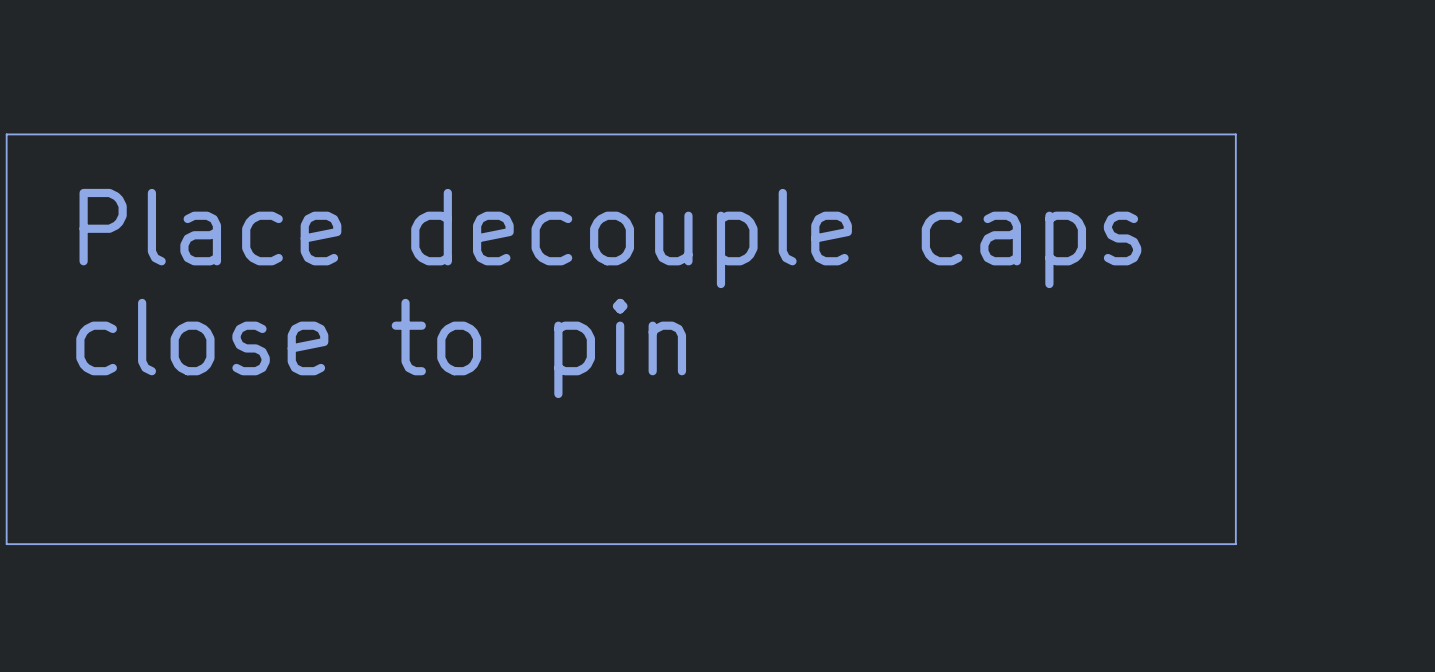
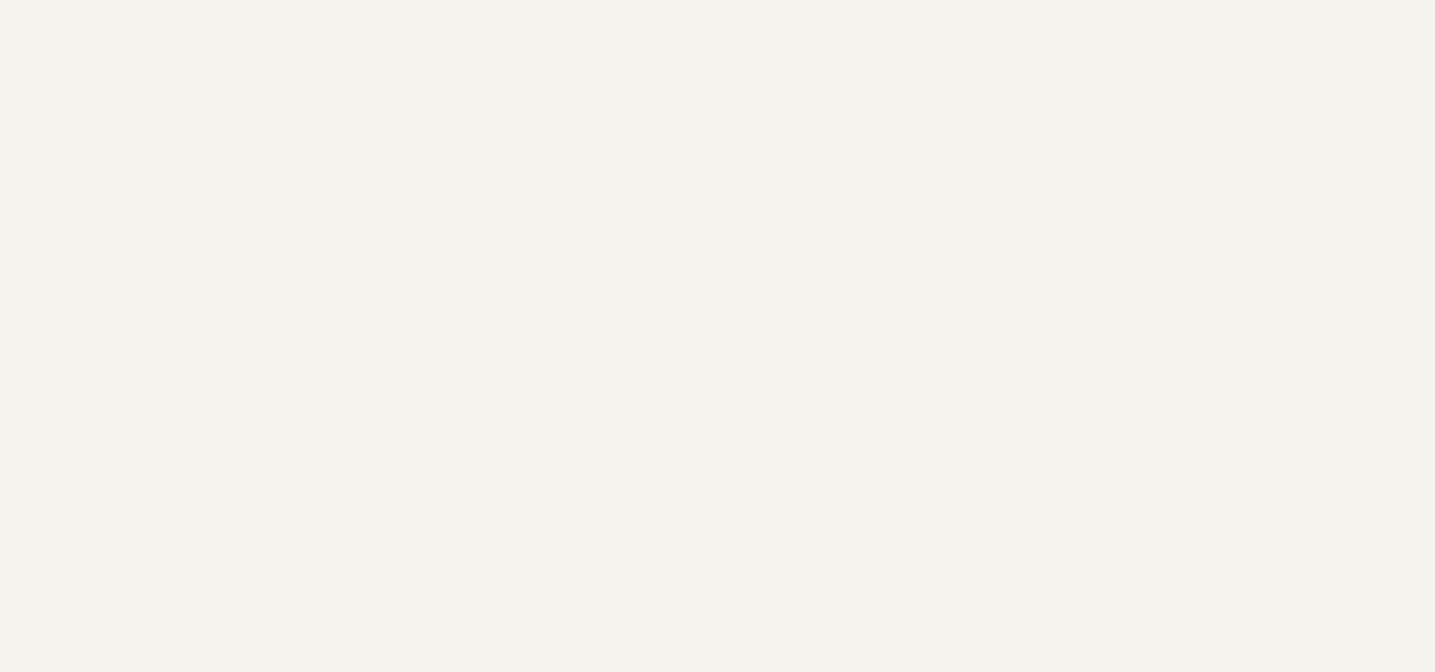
line: (6, 134) (1235, 134) (1235, 544) (6, 544) (6, 134) -> none
text: Place decouple caps (610, 238) -> none
text: close to pin (381, 348) -> none

